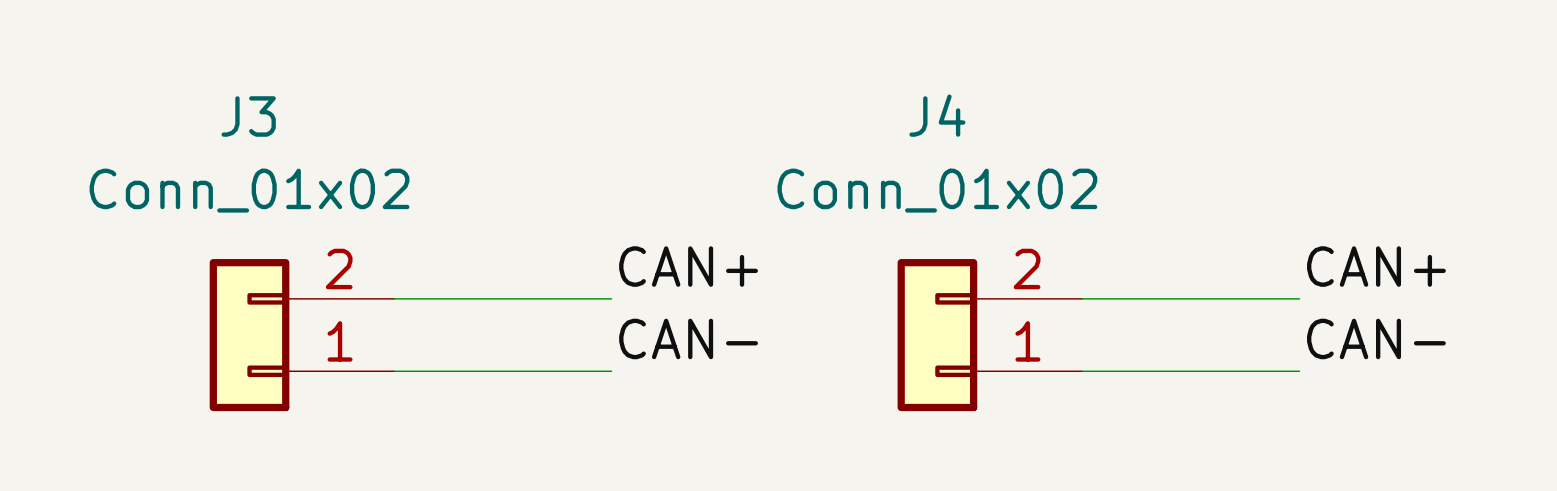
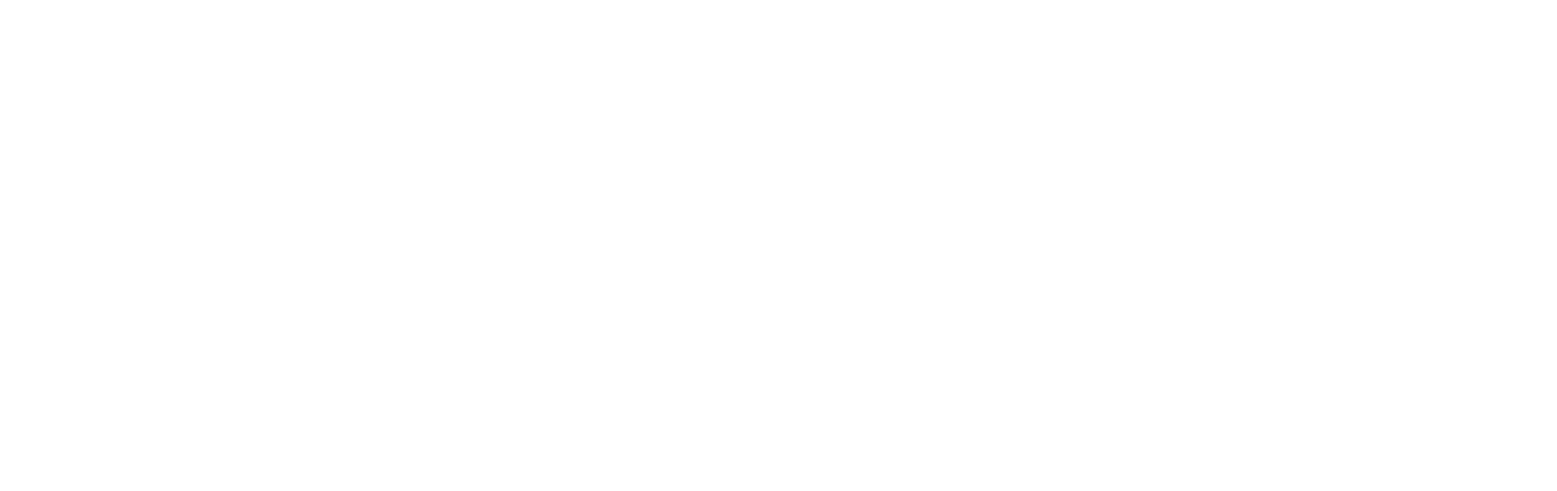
label: CAN+ (688, 266) -> none
label: CAN+ (1376, 266) -> none
wire: (394, 298) (611, 298) -> none
wire: (1082, 298) (1299, 298) -> none
J3: Conn_01x02 (302, 335) -> none
J4: Conn_01x02 (989, 335) -> none
label: CAN- (688, 338) -> none
label: CAN- (1376, 338) -> none
wire: (394, 371) (611, 371) -> none
wire: (1082, 371) (1299, 371) -> none

